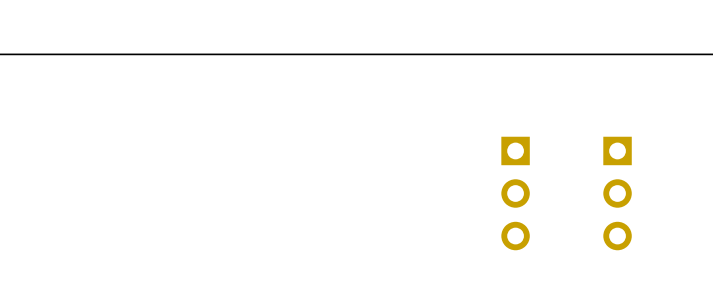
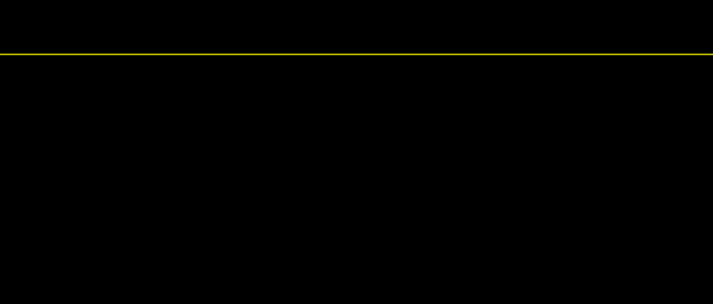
part: (515, 193) -> none
part: (617, 193) -> none

